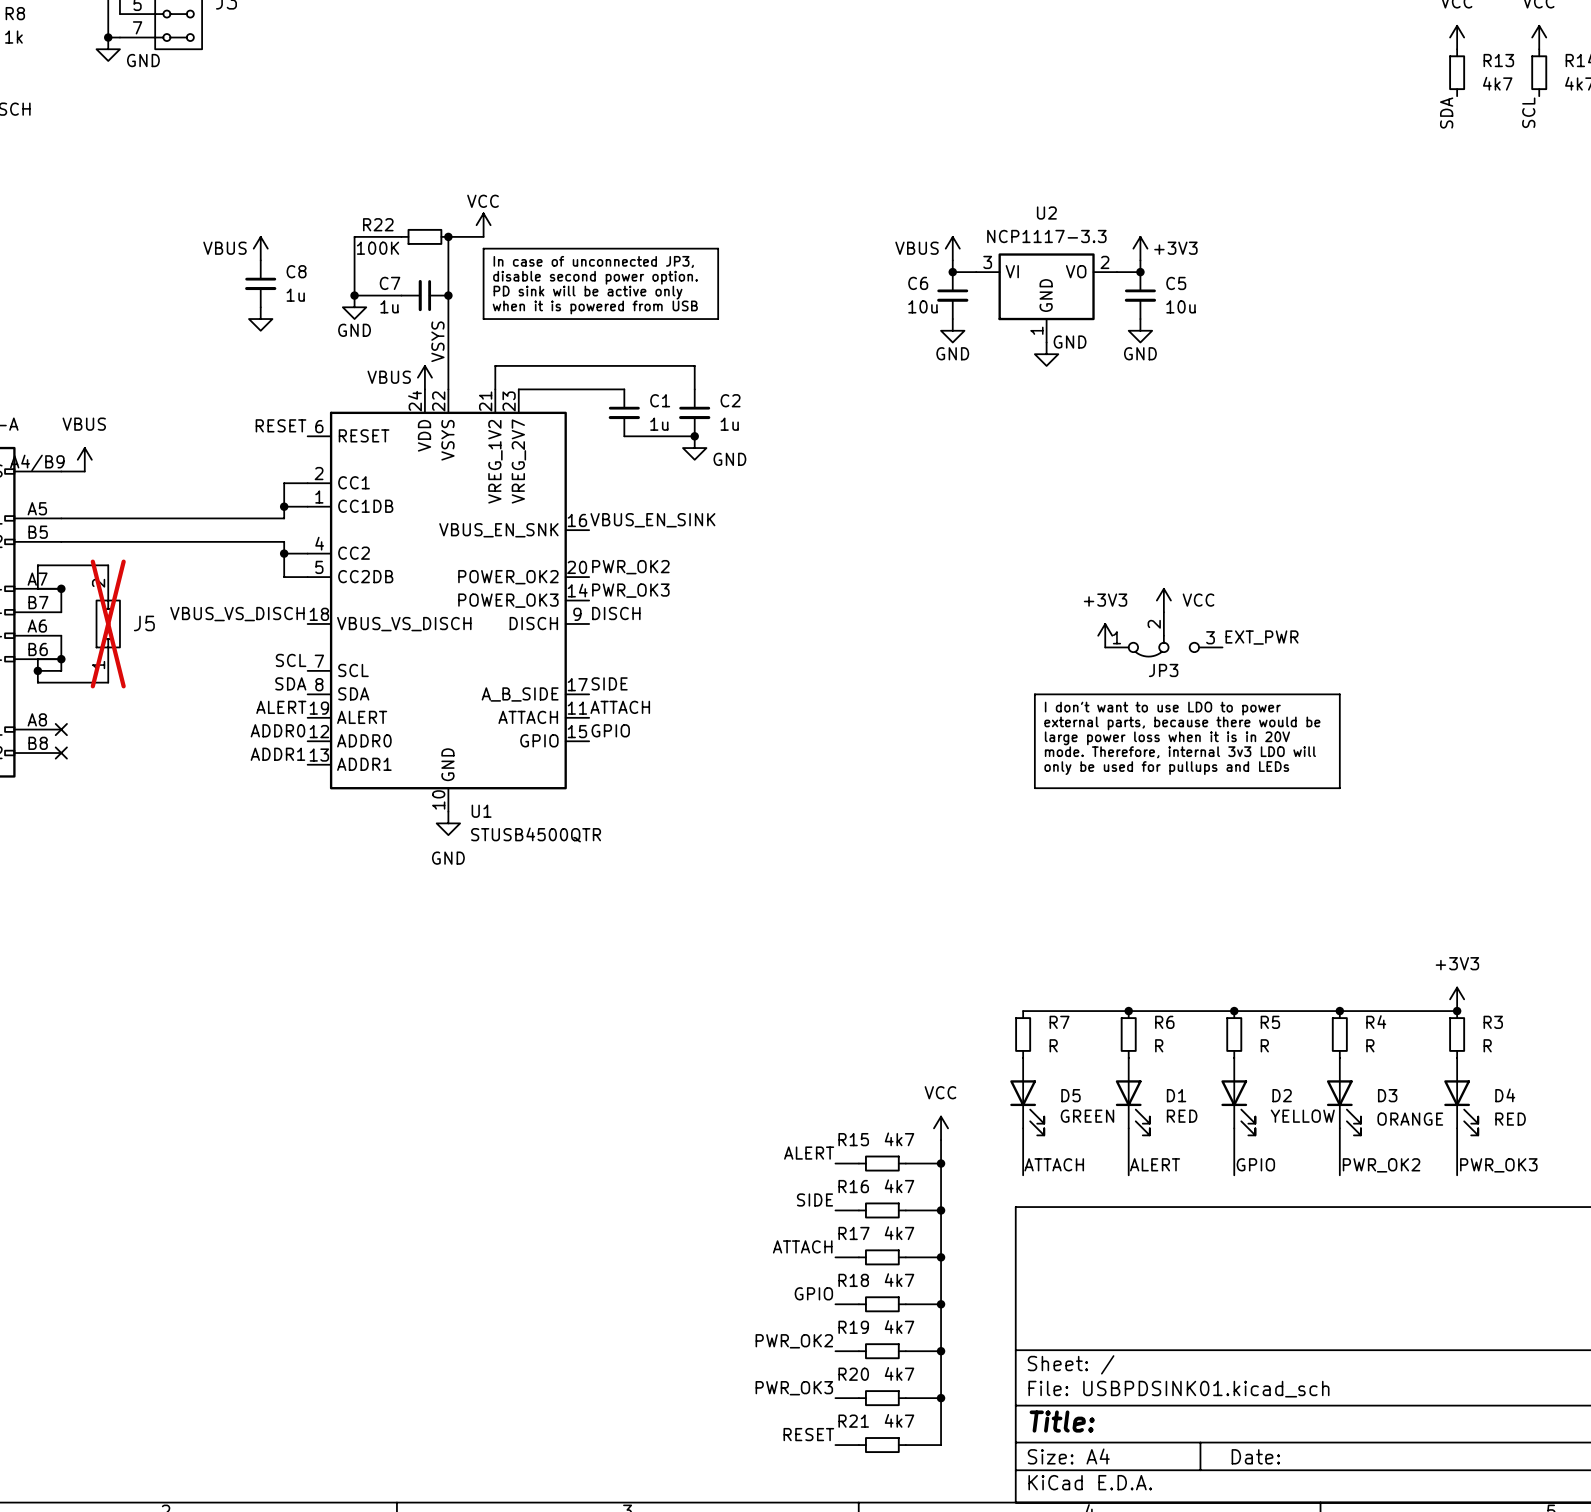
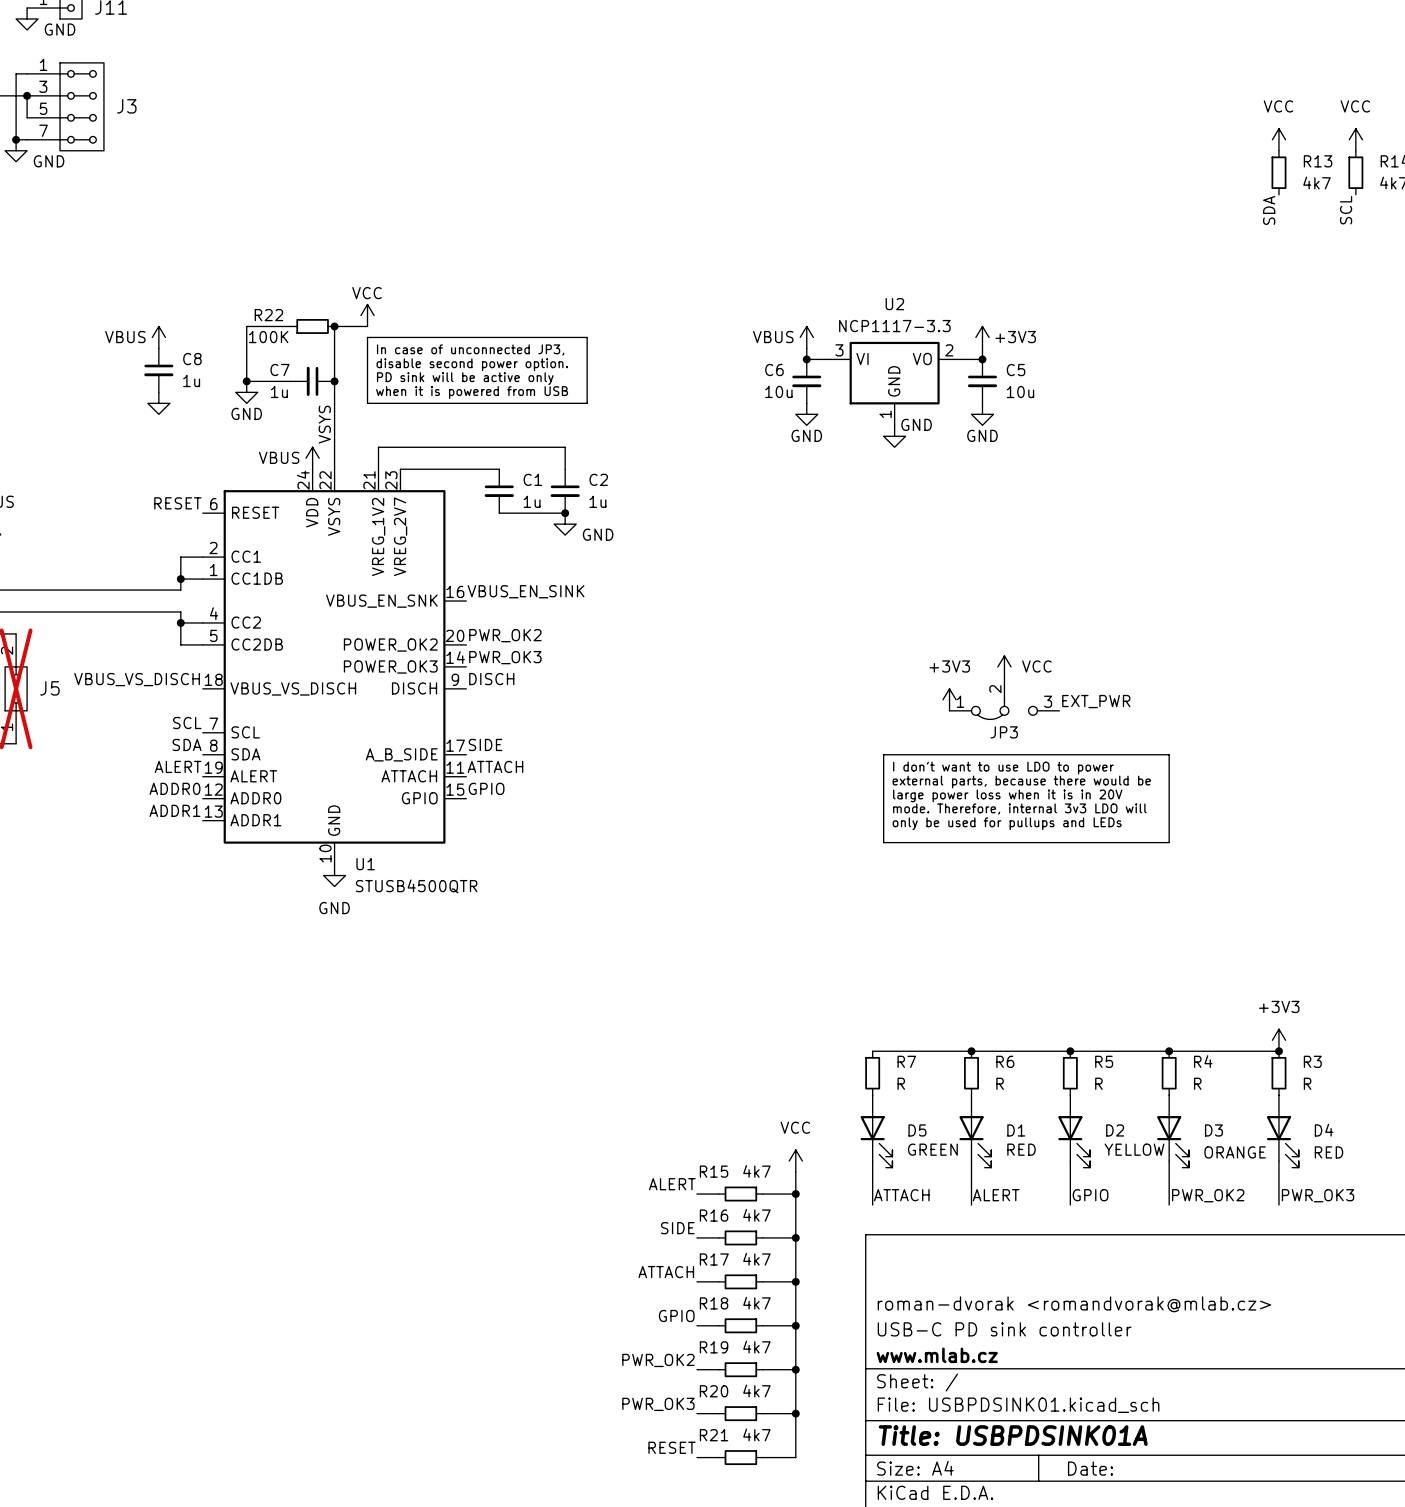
title block: none -> roman-dvorak <romandvorak@mlab.cz> (1074, 1304)
title block: none -> USB-C PD sink controller (1004, 1329)
title block: none -> www.mlab.cz (937, 1355)
title block: Title: (1062, 1421) -> Title: USBPDSINK01A (1013, 1435)

